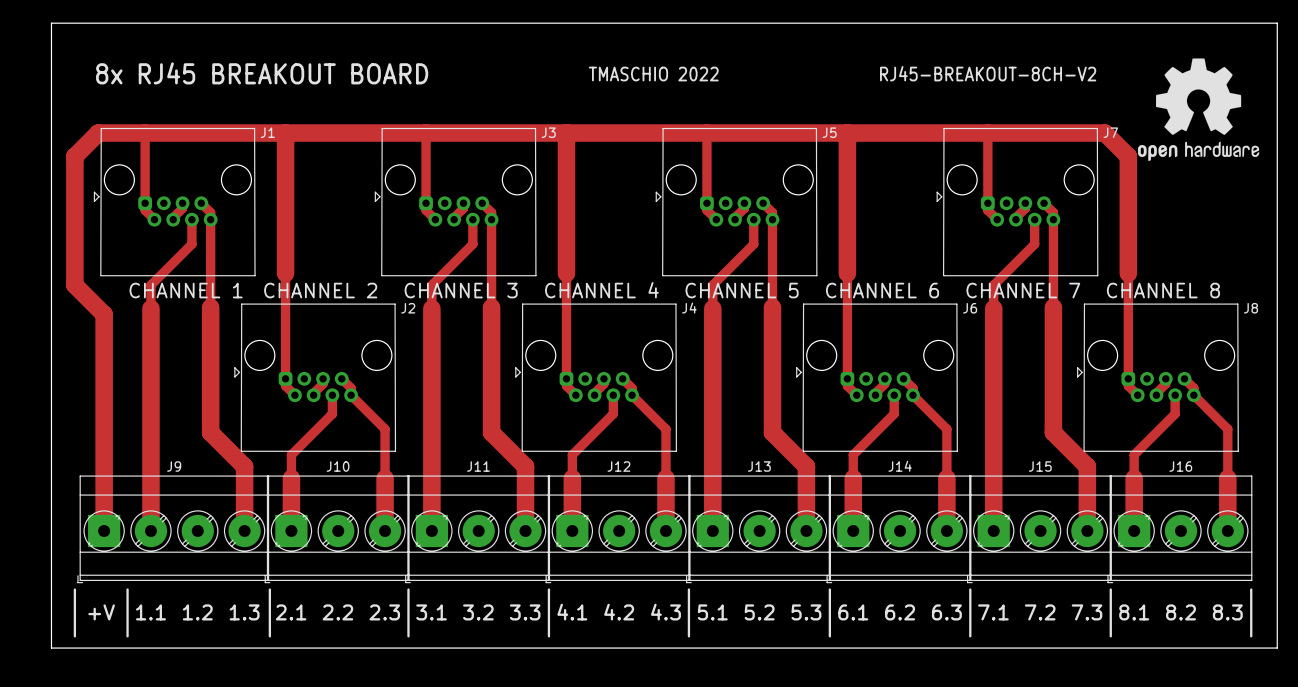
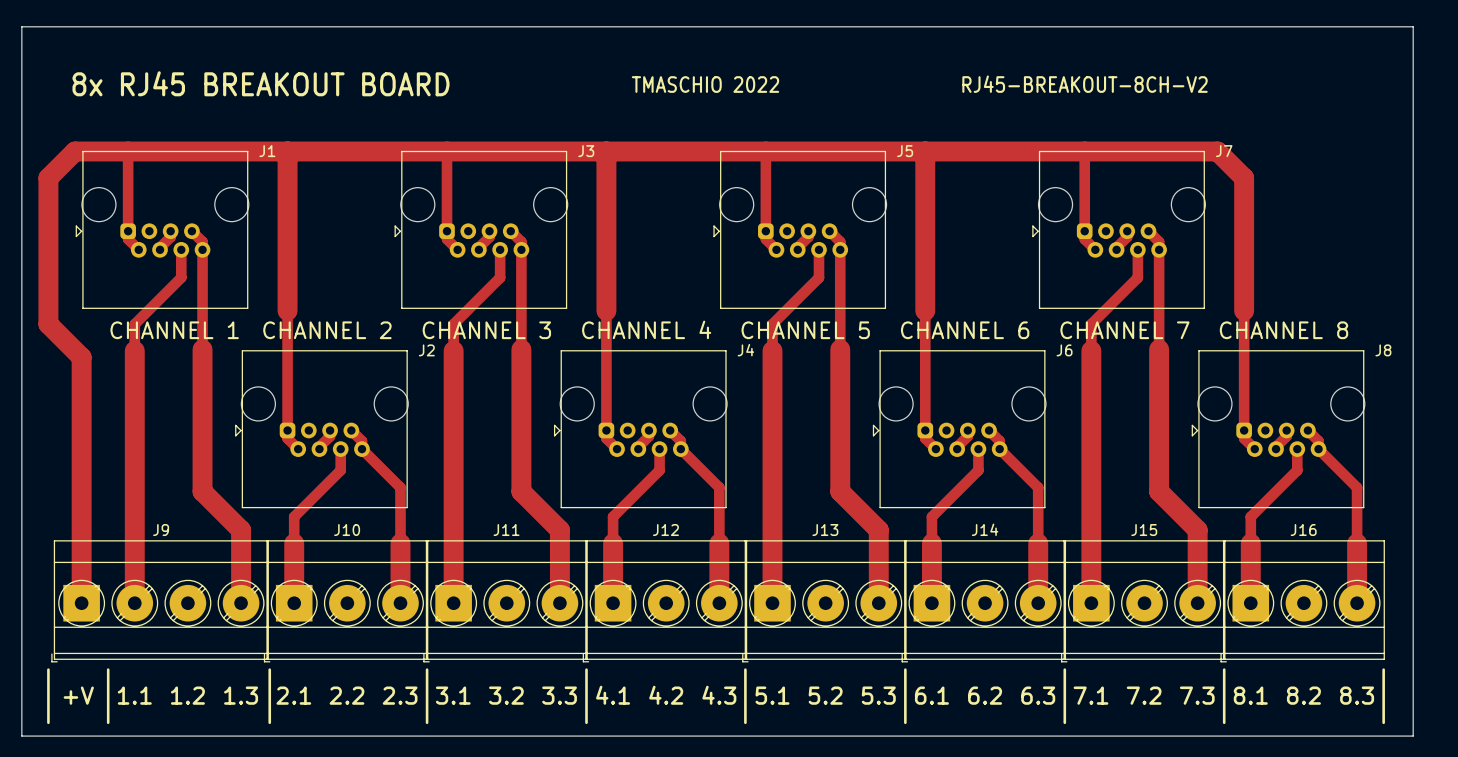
drawing: [1137, 58, 1260, 162] -> none
J1 footprint: [93, 127, 256, 277] -> [75, 150, 249, 309]
J3 footprint: [374, 127, 537, 277] -> [394, 150, 568, 309]
J5 footprint: [655, 127, 818, 277] -> [713, 150, 887, 309]
J7 footprint: [936, 127, 1099, 277] -> [1032, 150, 1206, 309]
J2 footprint: [234, 303, 397, 452] -> [235, 350, 409, 509]
J4 footprint: [515, 303, 677, 452] -> [553, 350, 728, 509]
J6 footprint: [796, 303, 958, 452] -> [872, 350, 1046, 509]
J8 footprint: [1077, 303, 1239, 452] -> [1191, 350, 1365, 509]

